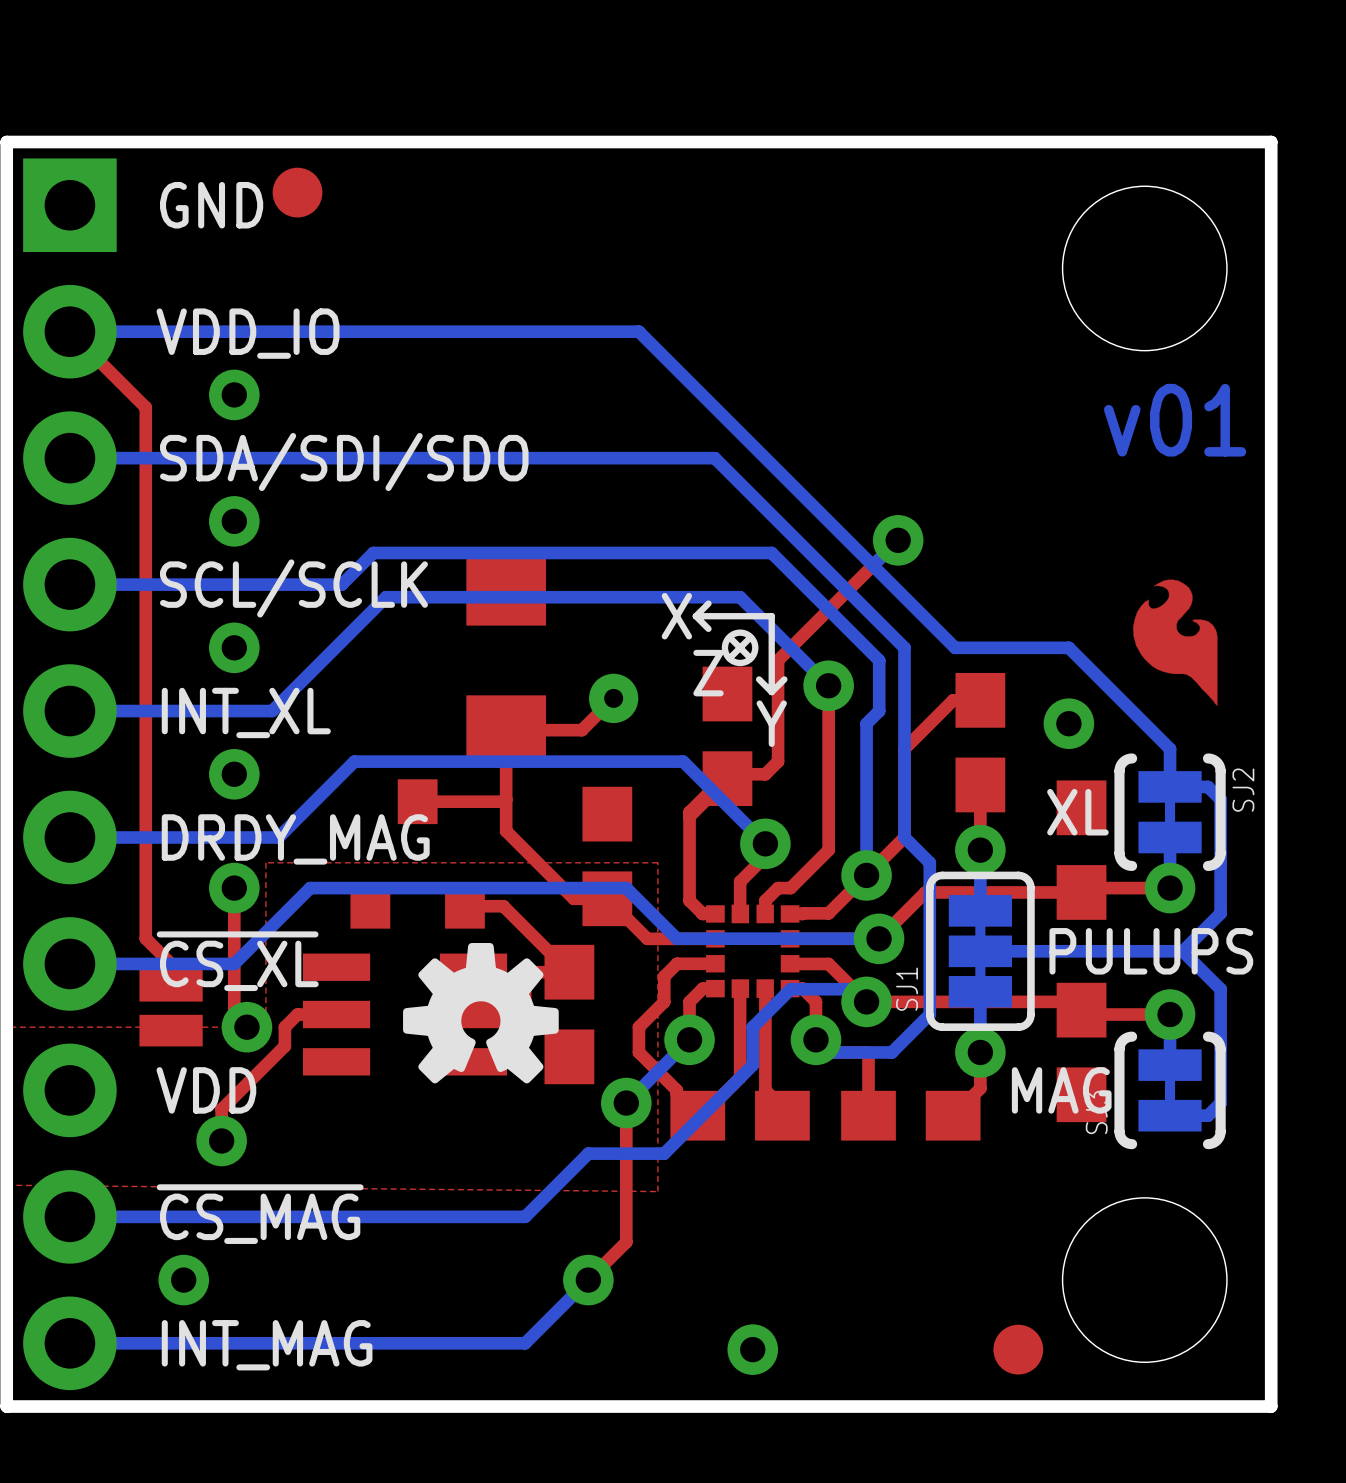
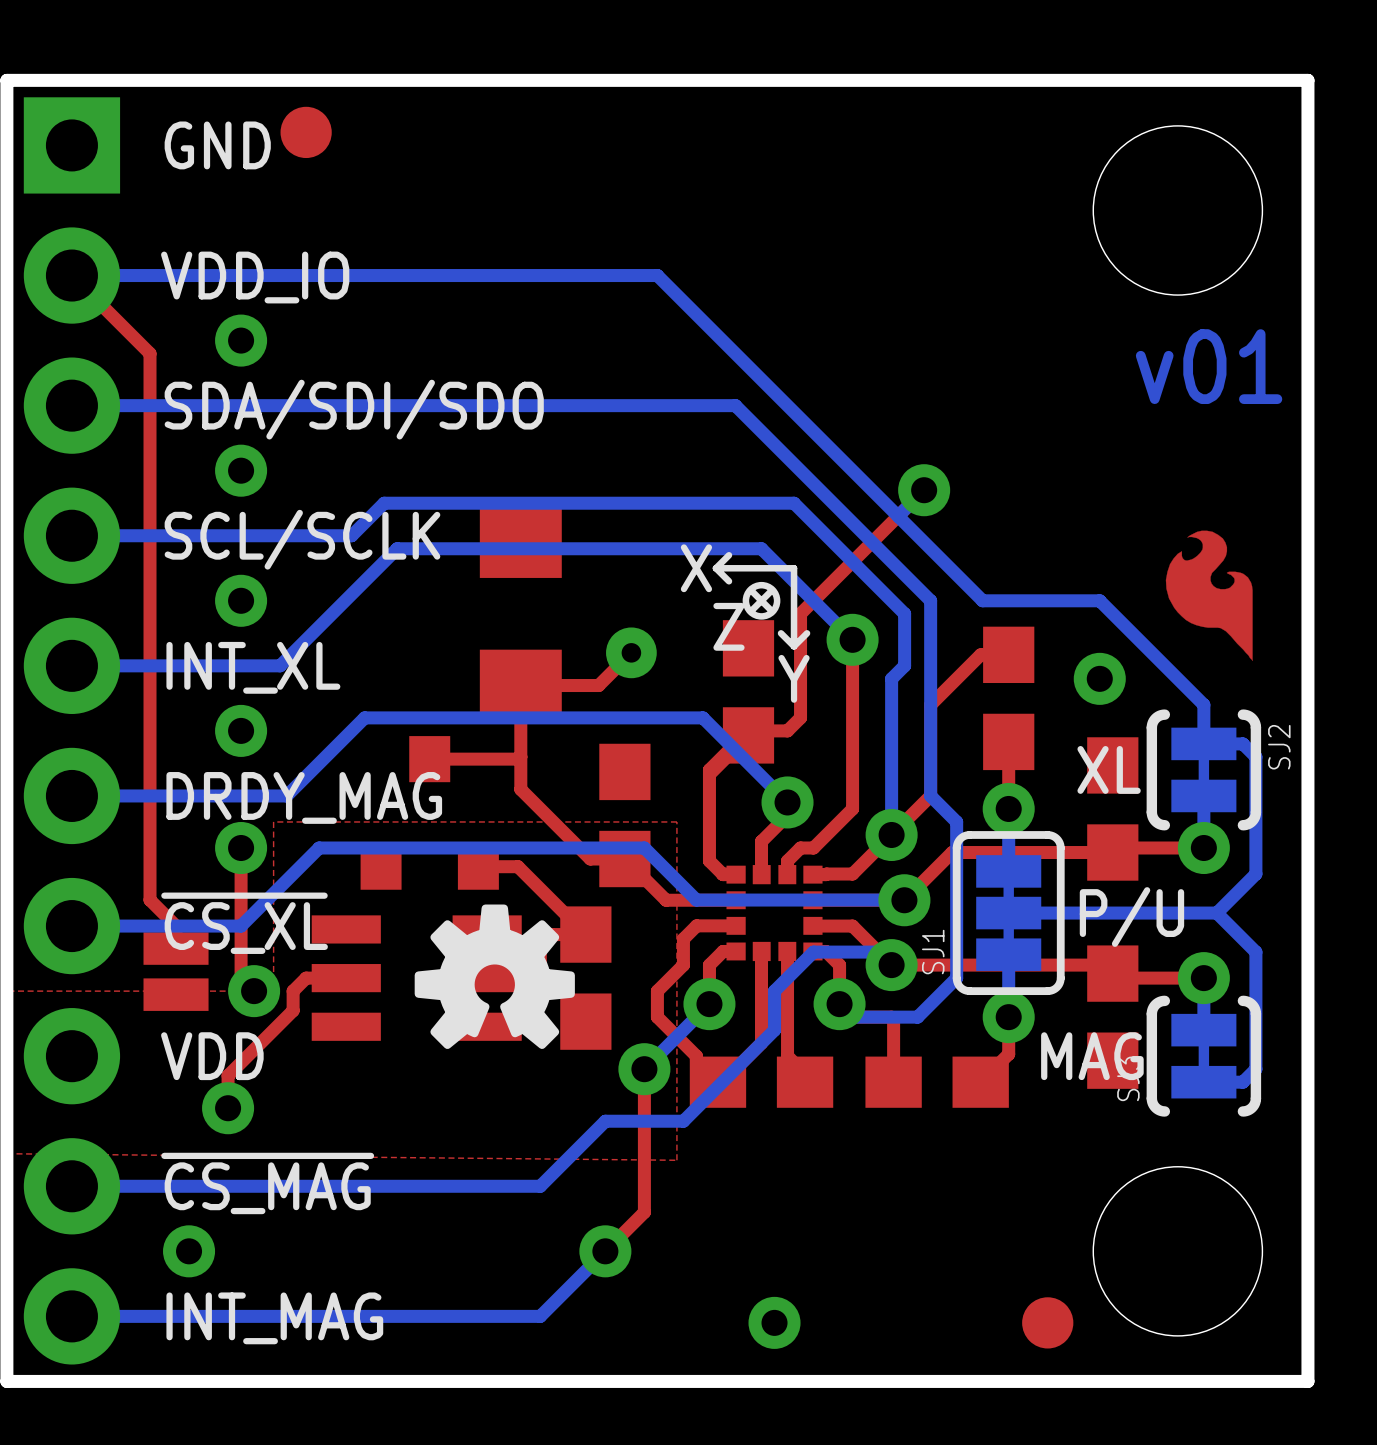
text: PULUPS (1151, 951) -> P/U (1131, 917)

